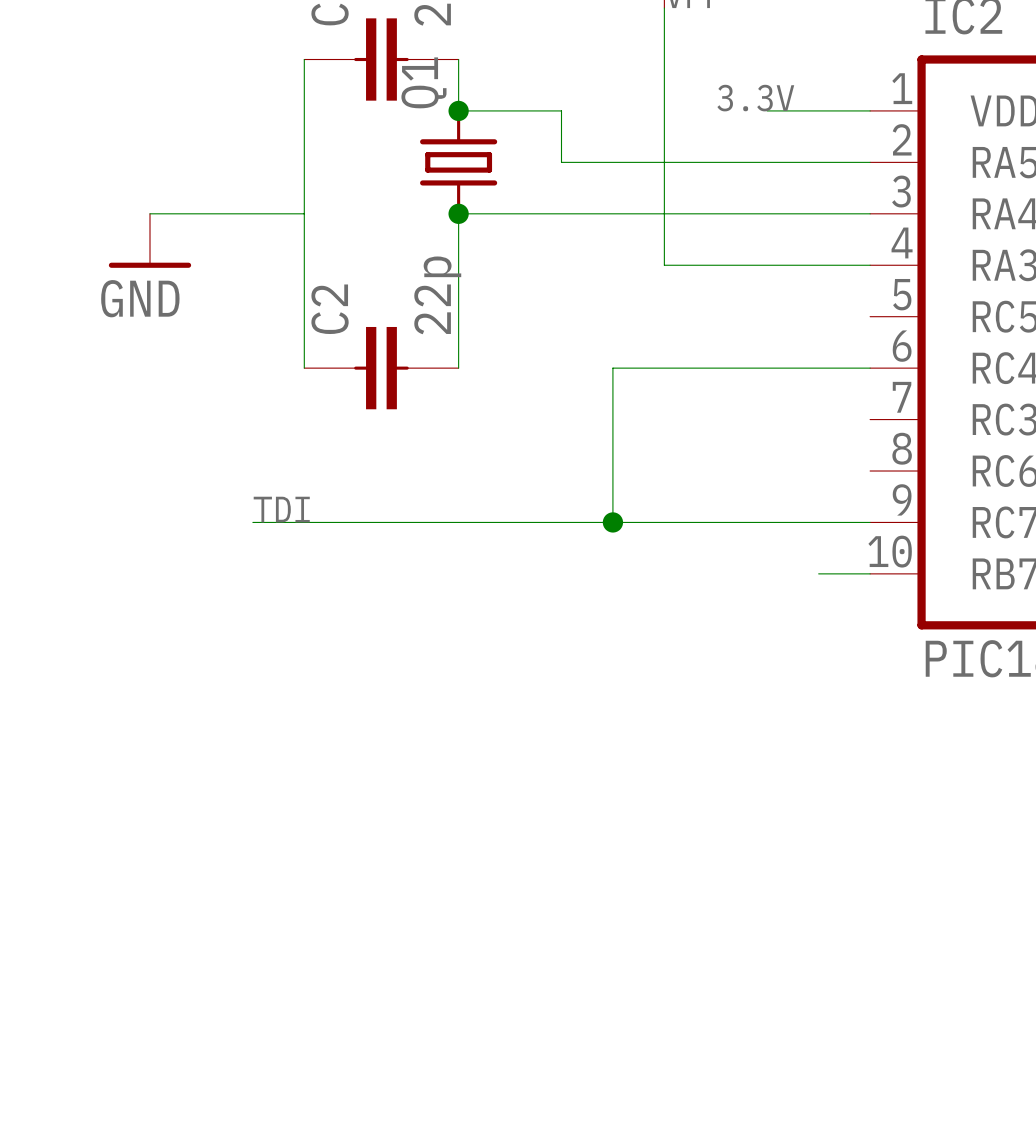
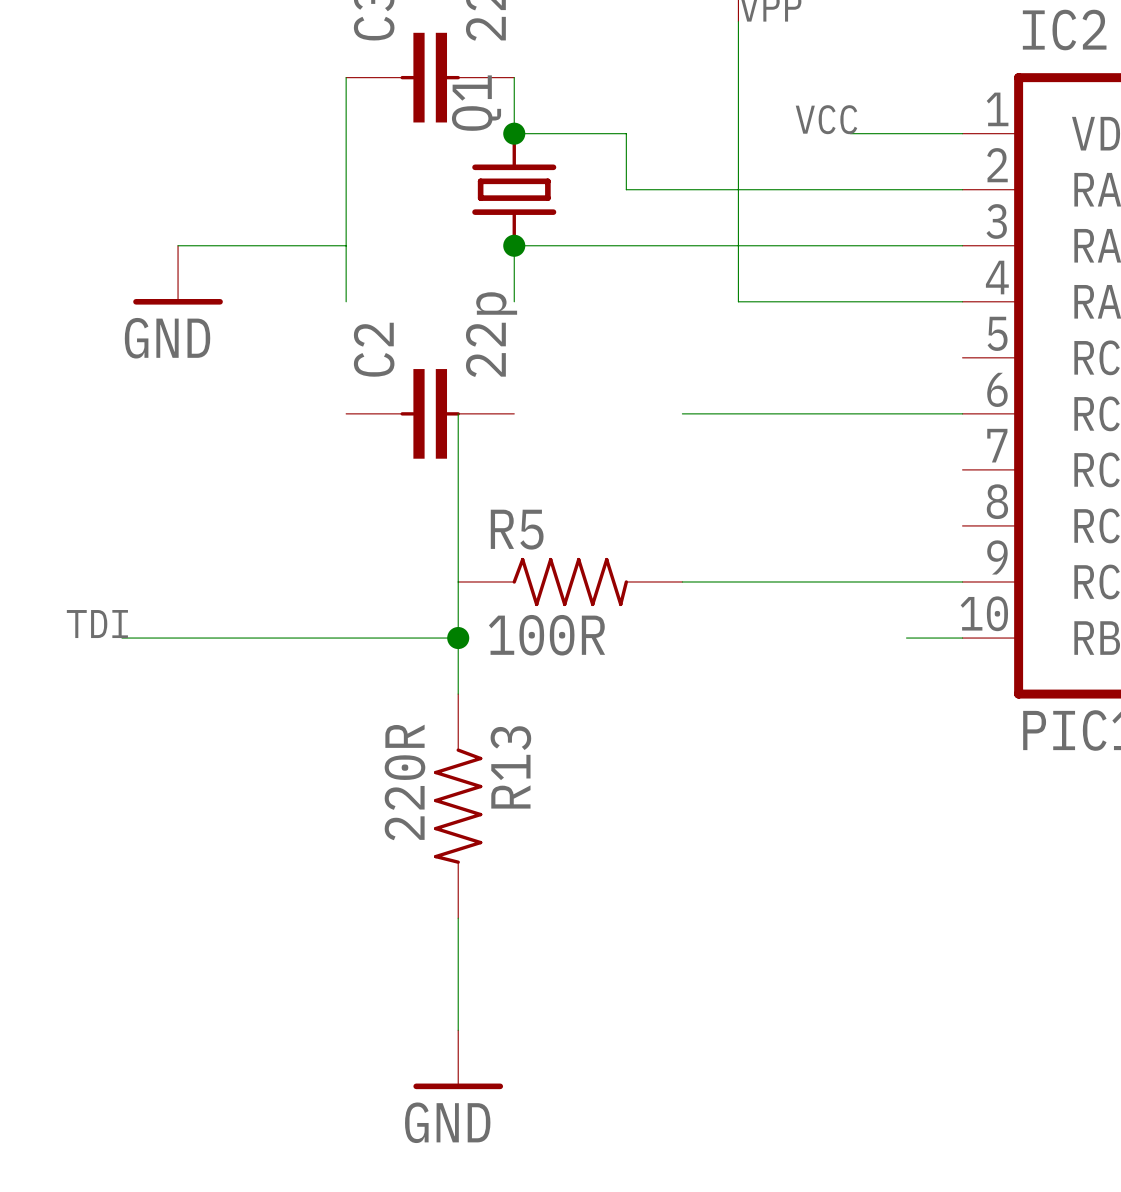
label: 3.3V (755, 98) -> VCC (826, 119)
wire: (304, 265) (304, 368) -> none
wire: (458, 265) (458, 368) -> none
wire: none -> (458, 413) (458, 694)
wire: (612, 368) (612, 522) (252, 522) -> none
label position: TDI (281, 509) -> TDI (97, 624)
R5: none -> 100R (570, 581)
junction: (612, 522) -> none
wire: none -> (121, 638) (458, 638)
junction: none -> (458, 638)
R13: none -> 220R (458, 806)
wire: none -> (458, 918) (458, 1030)
power symbol: none -> GND (458, 1059)

